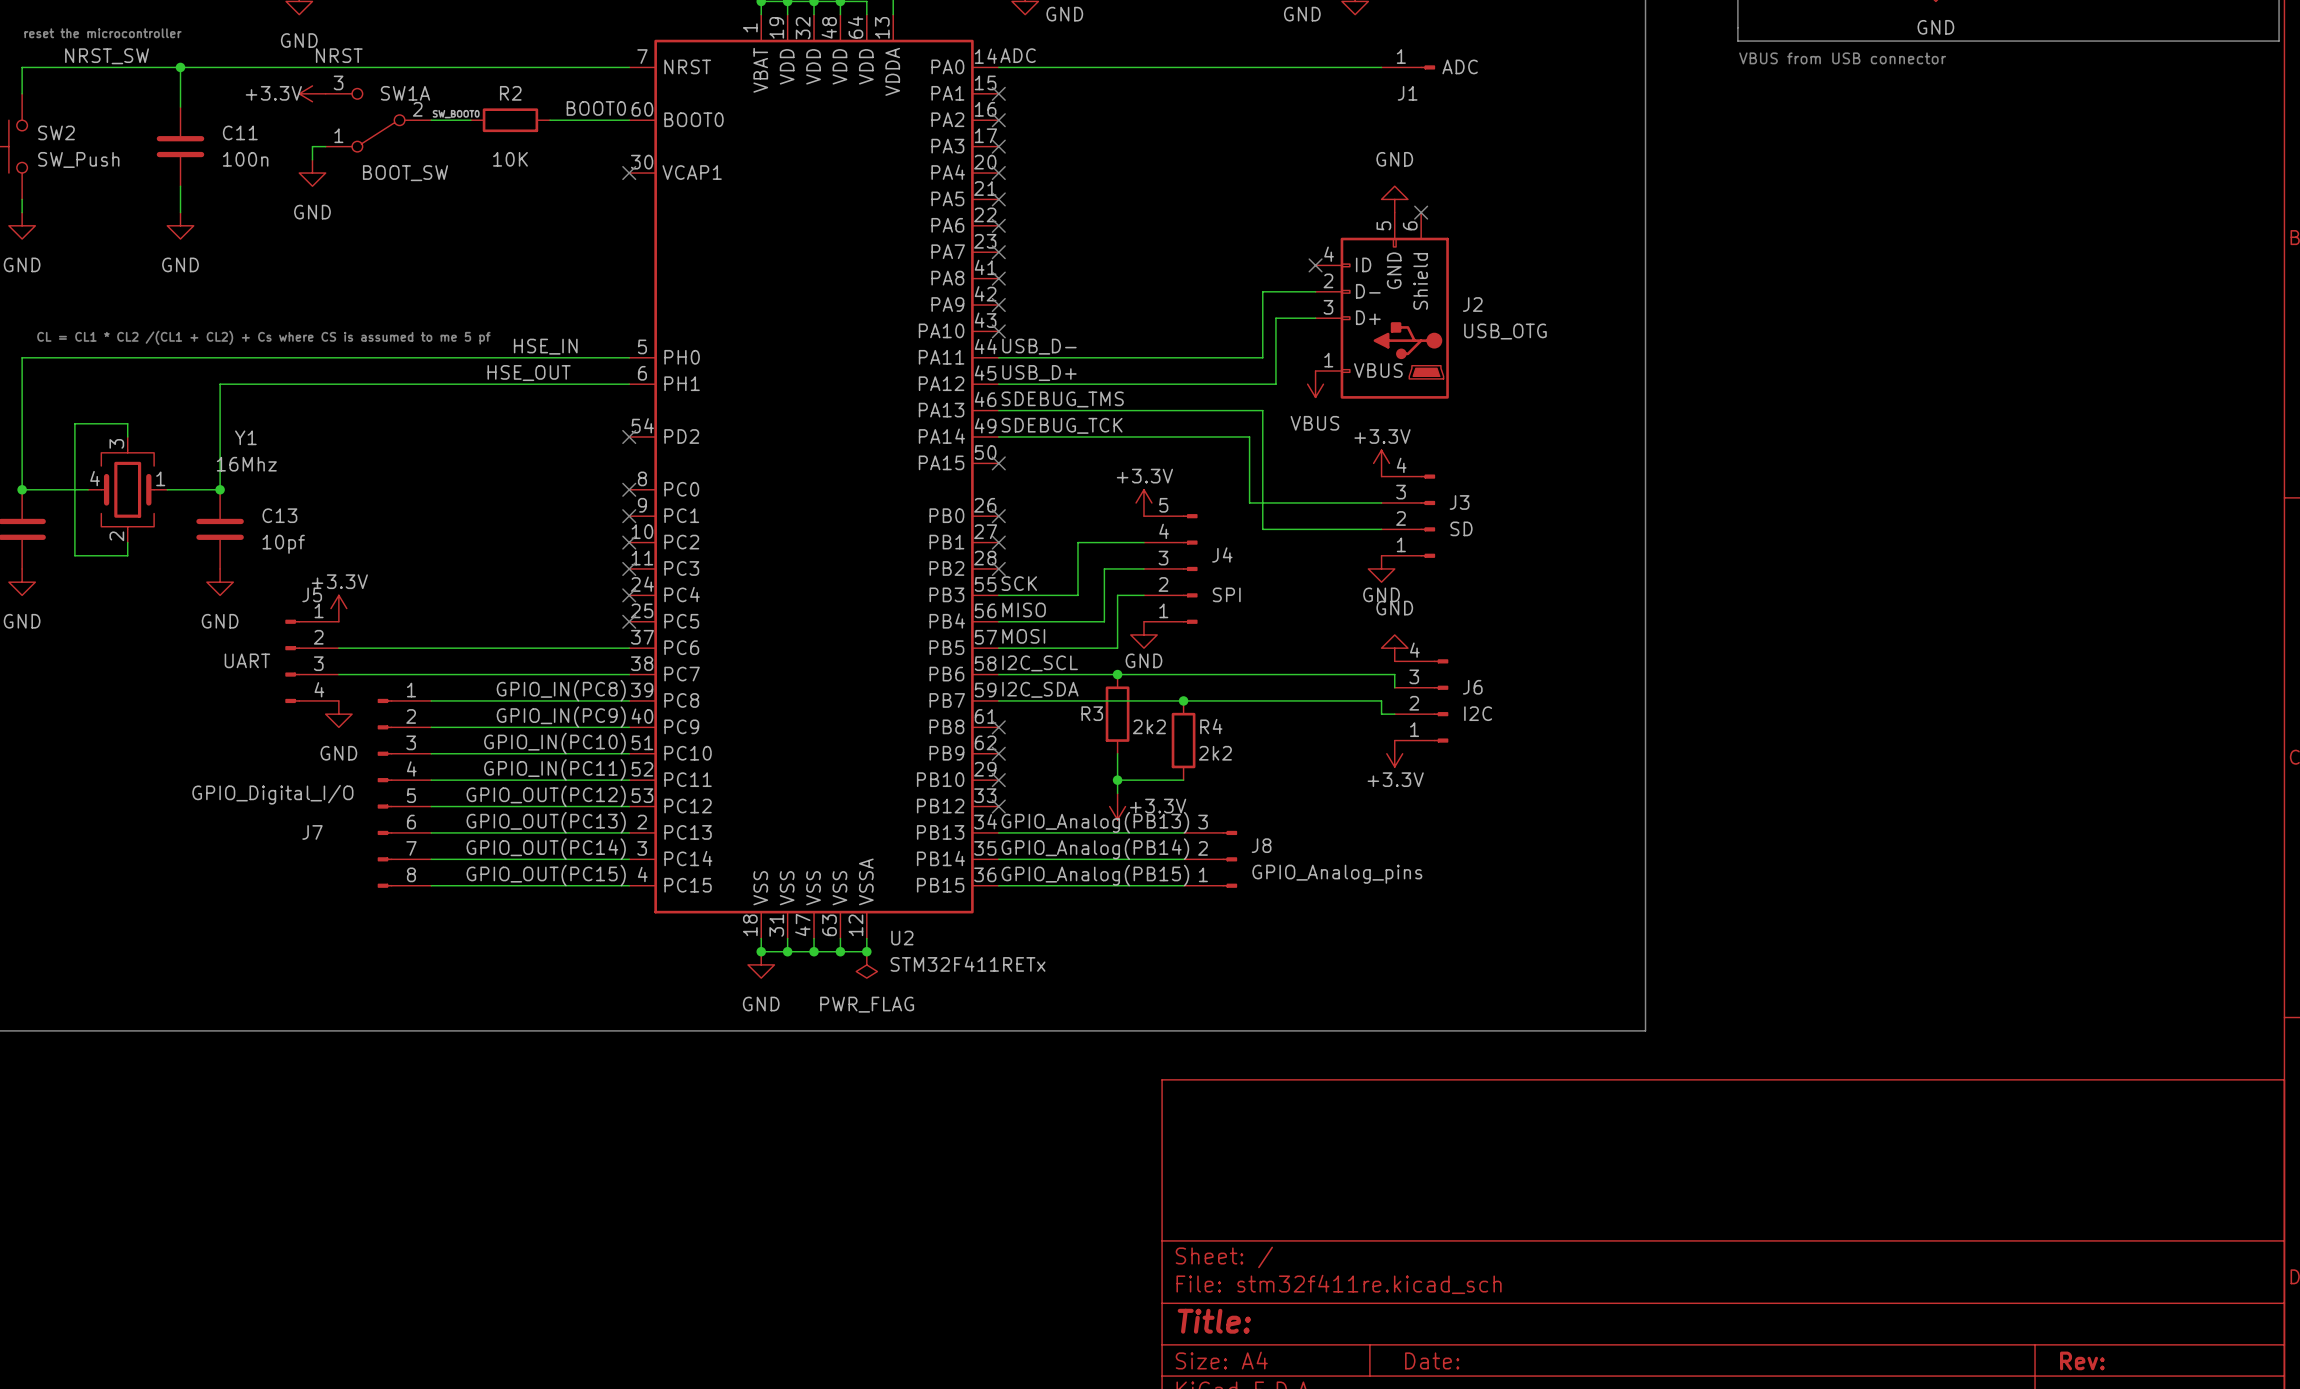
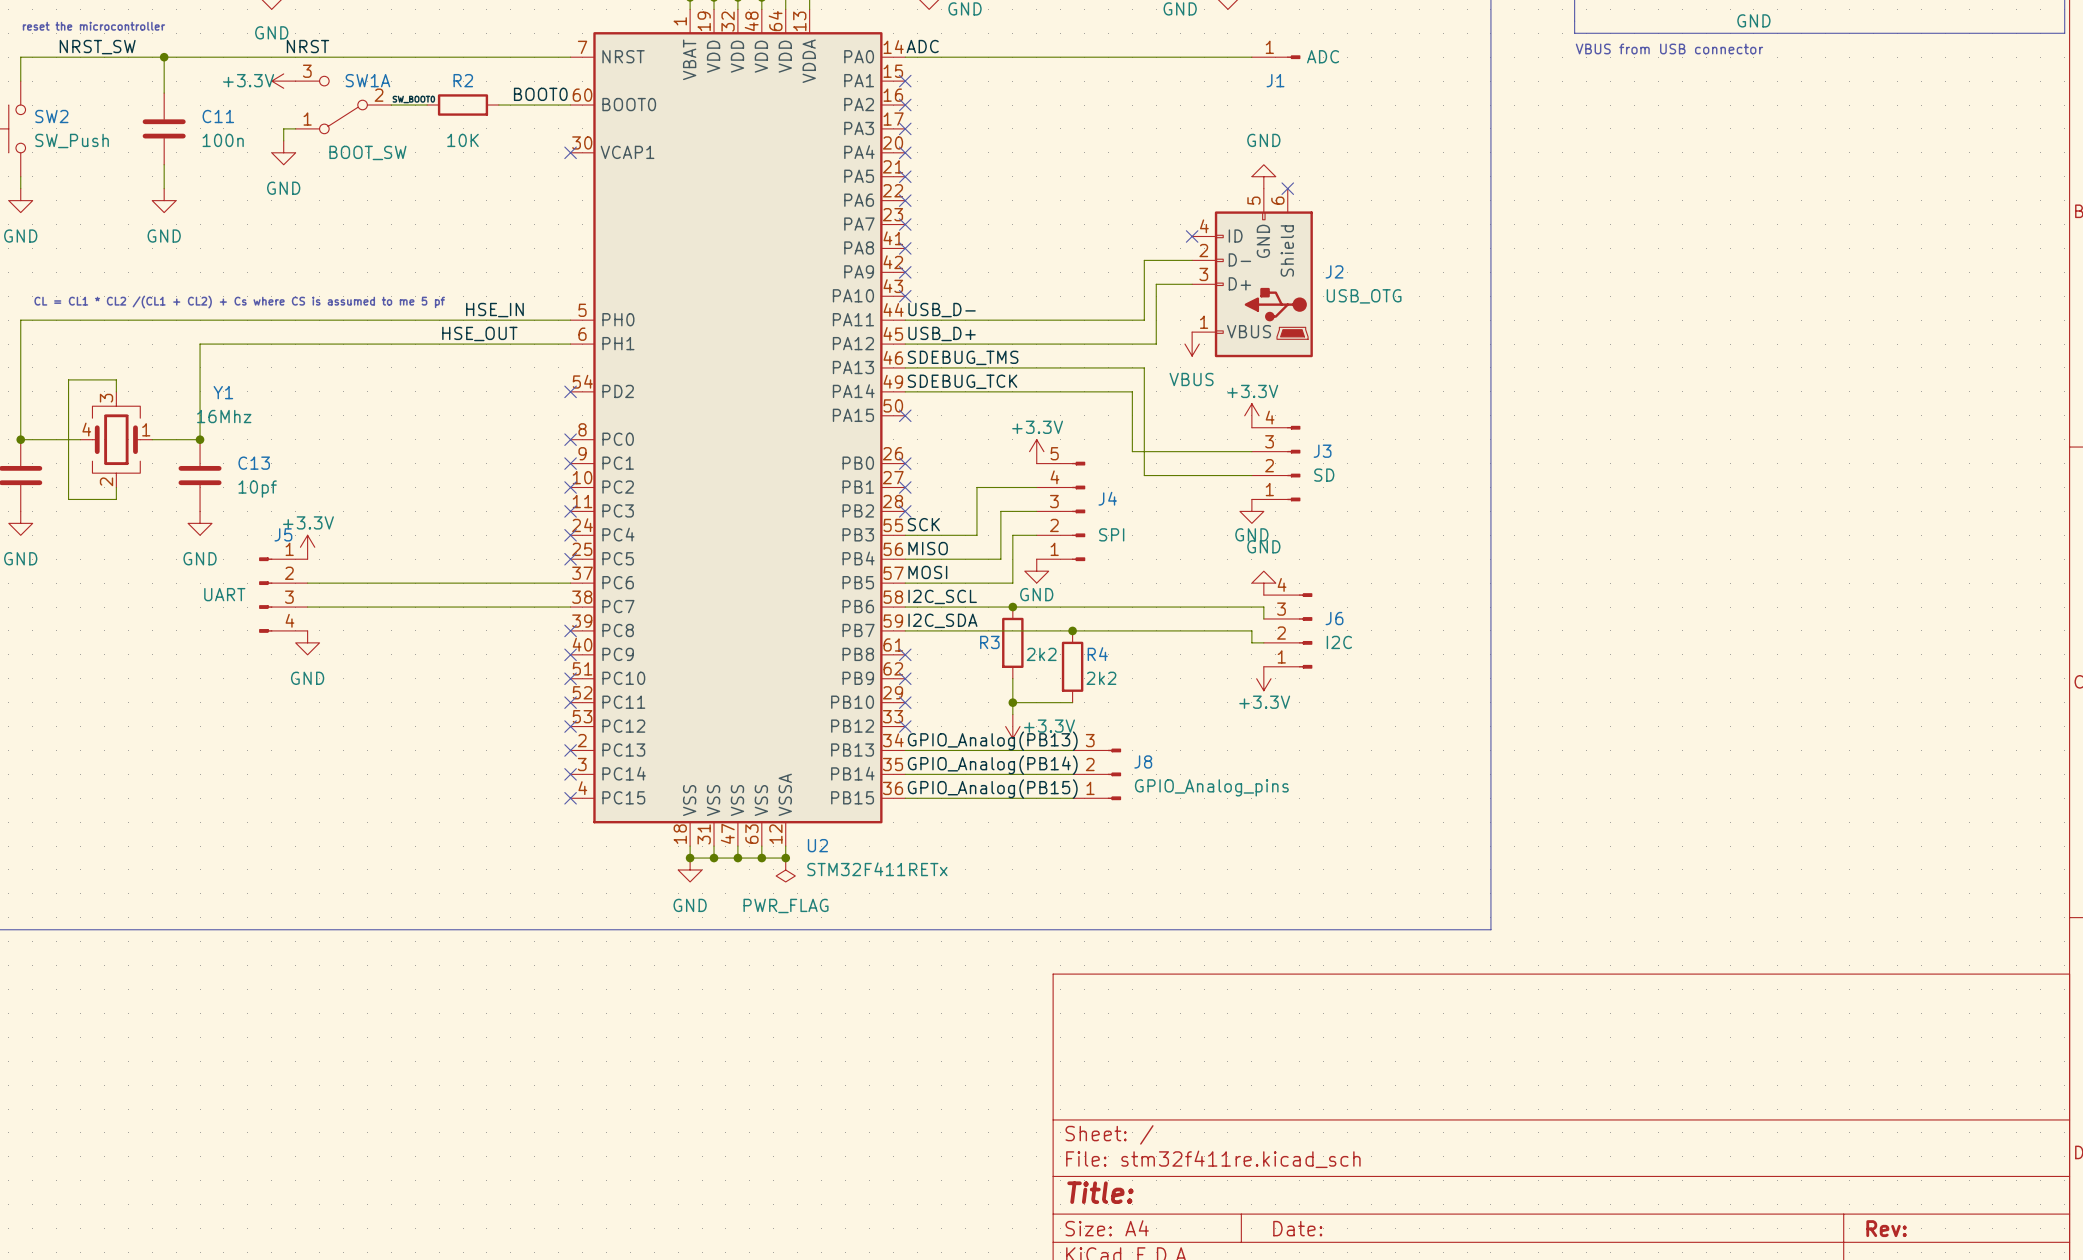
label: GPIO_IN(PC8) (561, 690) -> none
wire: (431, 700) (629, 700) -> none
no-connect mark: none -> (570, 630)
label: GPIO_IN(PC9) (561, 717) -> none
wire: (431, 727) (629, 727) -> none
no-connect mark: none -> (570, 654)
label: GPIO_IN(PC10) (554, 743) -> none
wire: (431, 753) (629, 753) -> none
no-connect mark: none -> (570, 678)
label: GPIO_IN(PC11) (554, 769) -> none
wire: (431, 780) (629, 780) -> none
no-connect mark: none -> (570, 702)
J7: GPIO_Digital_I/O (404, 793) -> none
label: GPIO_OUT(PC12) (546, 796) -> none
wire: (431, 806) (629, 806) -> none
no-connect mark: none -> (570, 726)
label: GPIO_OUT(PC13) (546, 822) -> none
wire: (431, 832) (629, 832) -> none
no-connect mark: none -> (570, 750)
label: GPIO_OUT(PC14) (546, 849) -> none
wire: (431, 859) (629, 859) -> none
no-connect mark: none -> (570, 774)
label: GPIO_OUT(PC15) (546, 875) -> none
wire: (431, 885) (629, 885) -> none
no-connect mark: none -> (570, 798)

